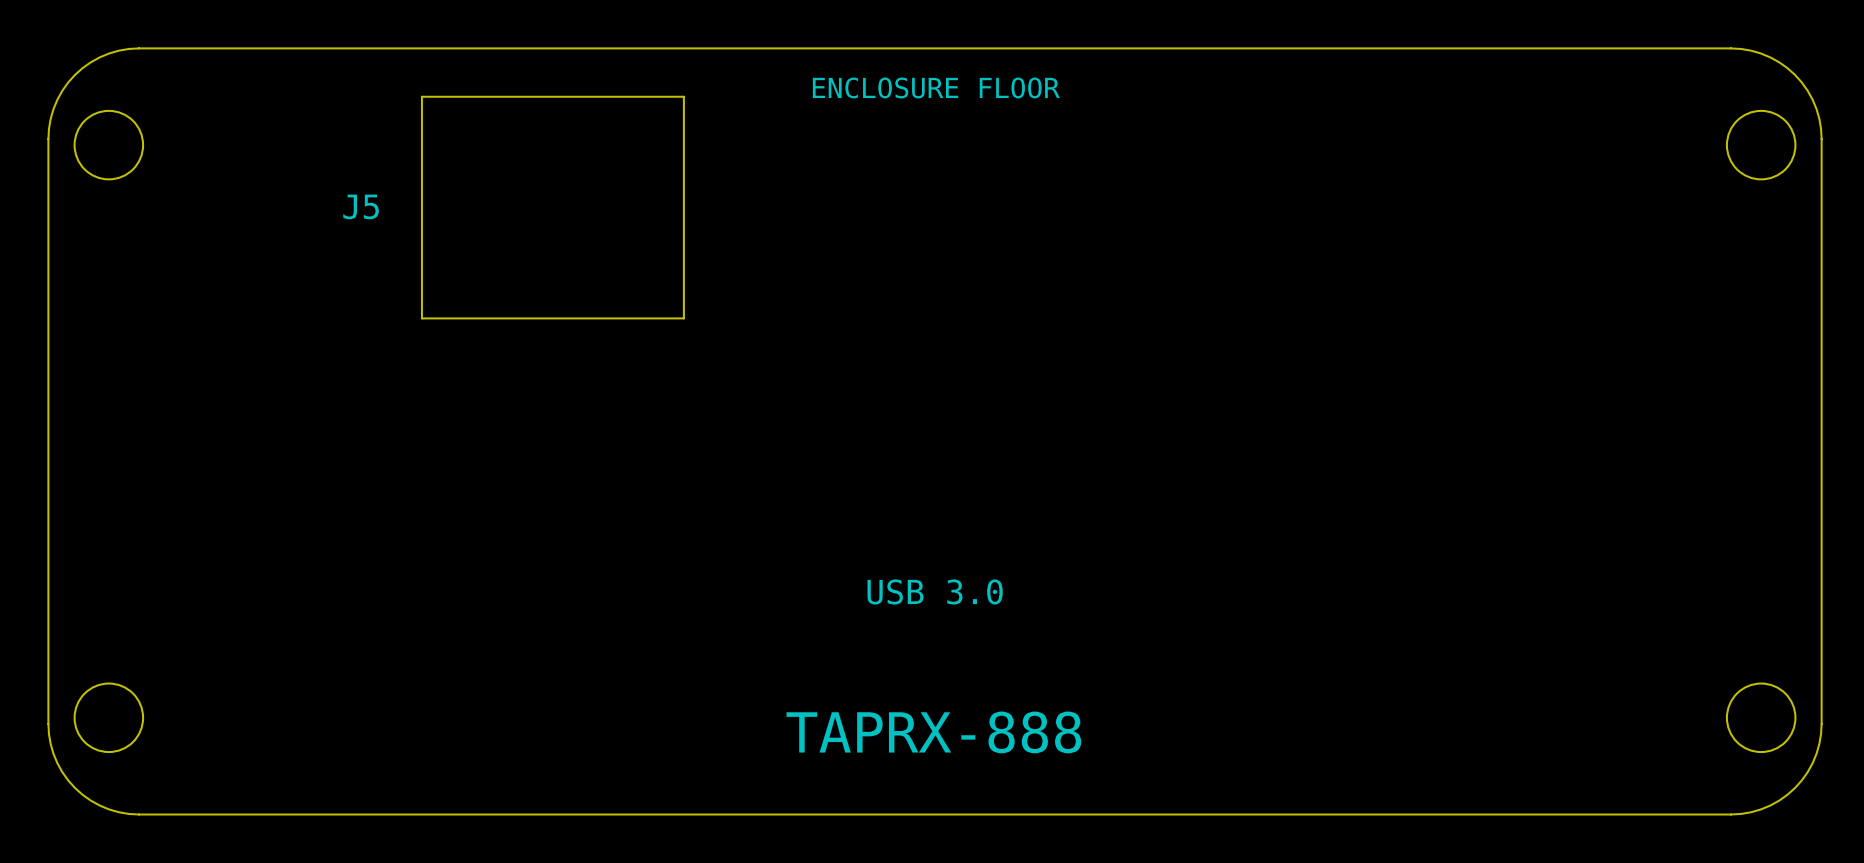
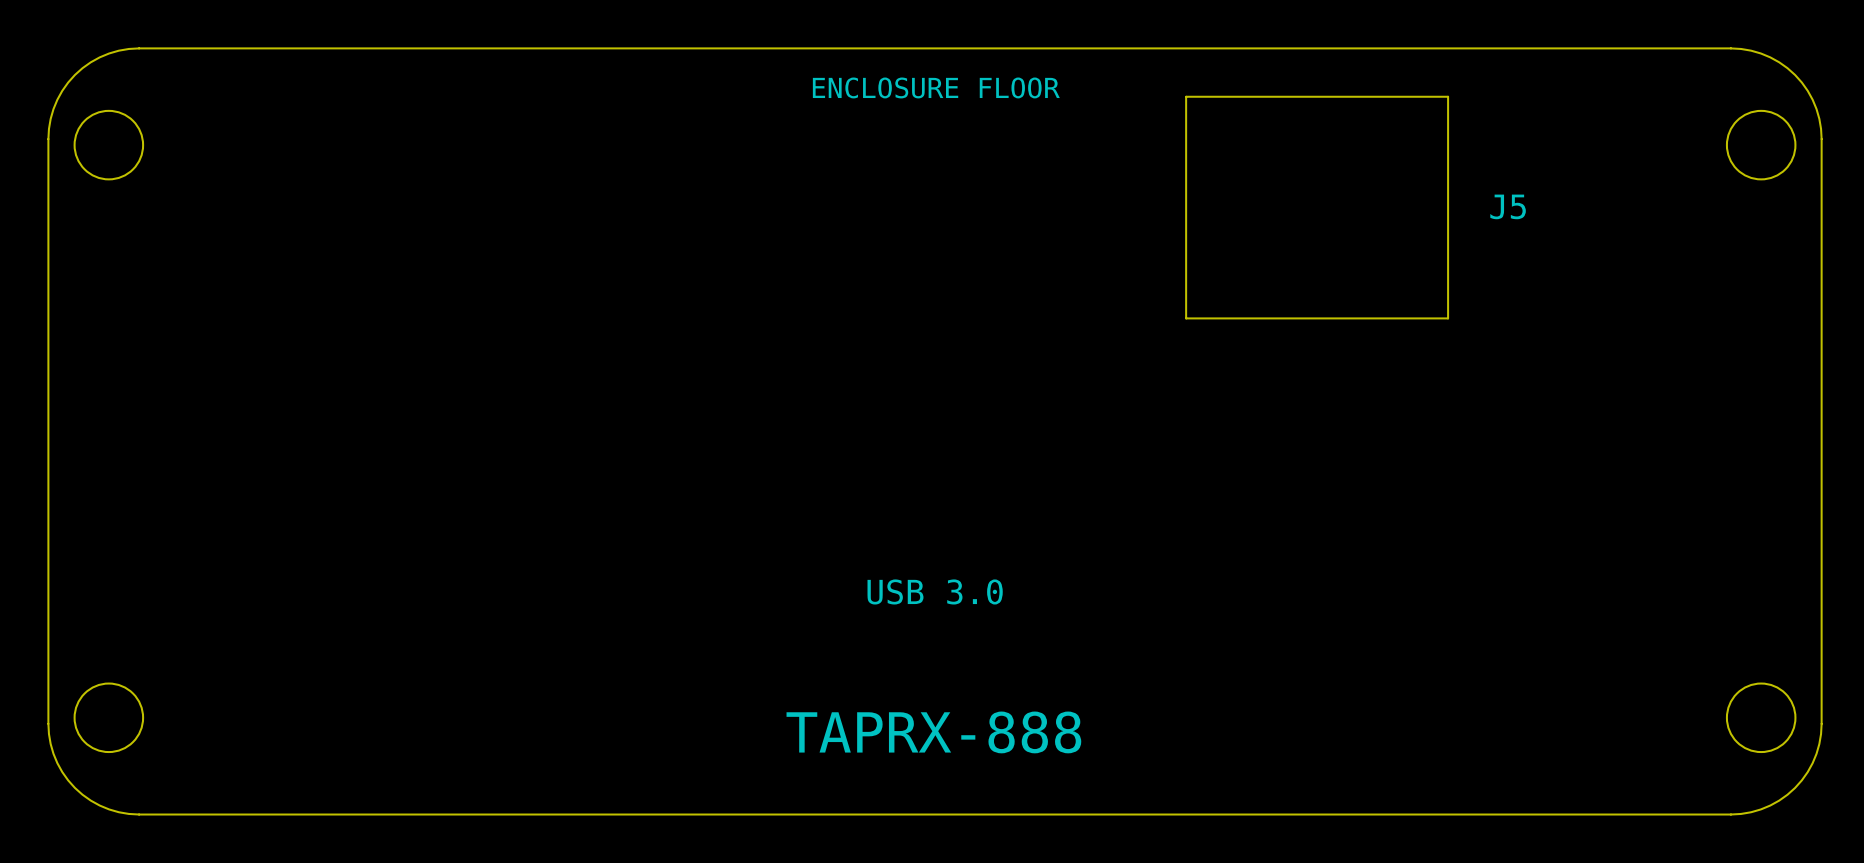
board edge: (421, 96) (683, 96) (683, 318) (421, 318) (421, 96) -> none
board edge: none -> (1186, 96) (1448, 96) (1448, 318) (1186, 318) (1186, 96)
text: J5 (361, 206) -> none
text: none -> J5 (1508, 206)

